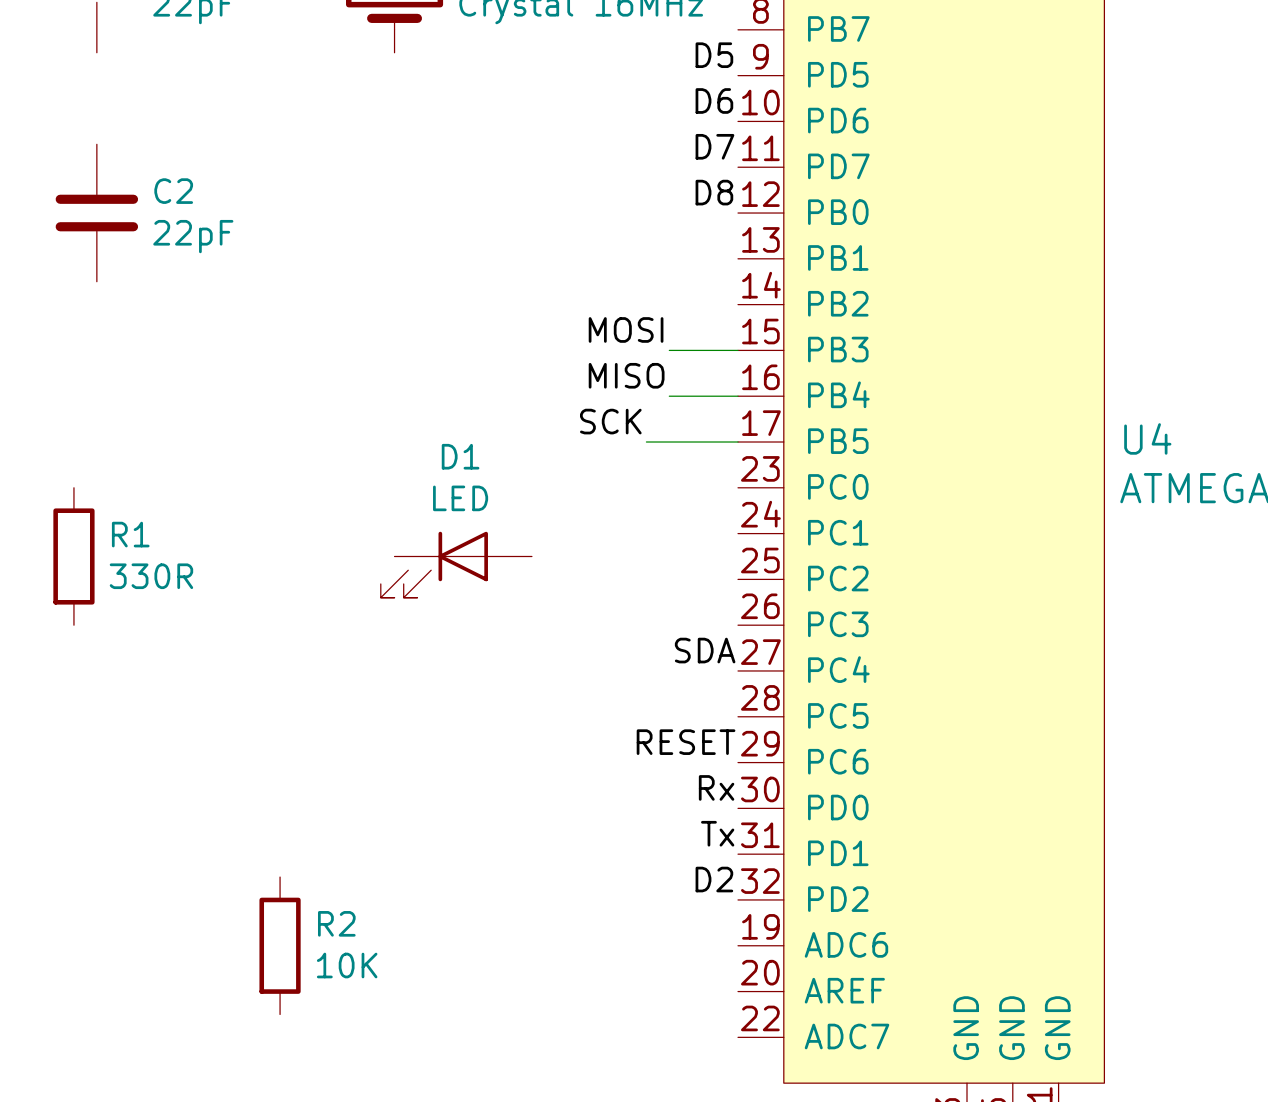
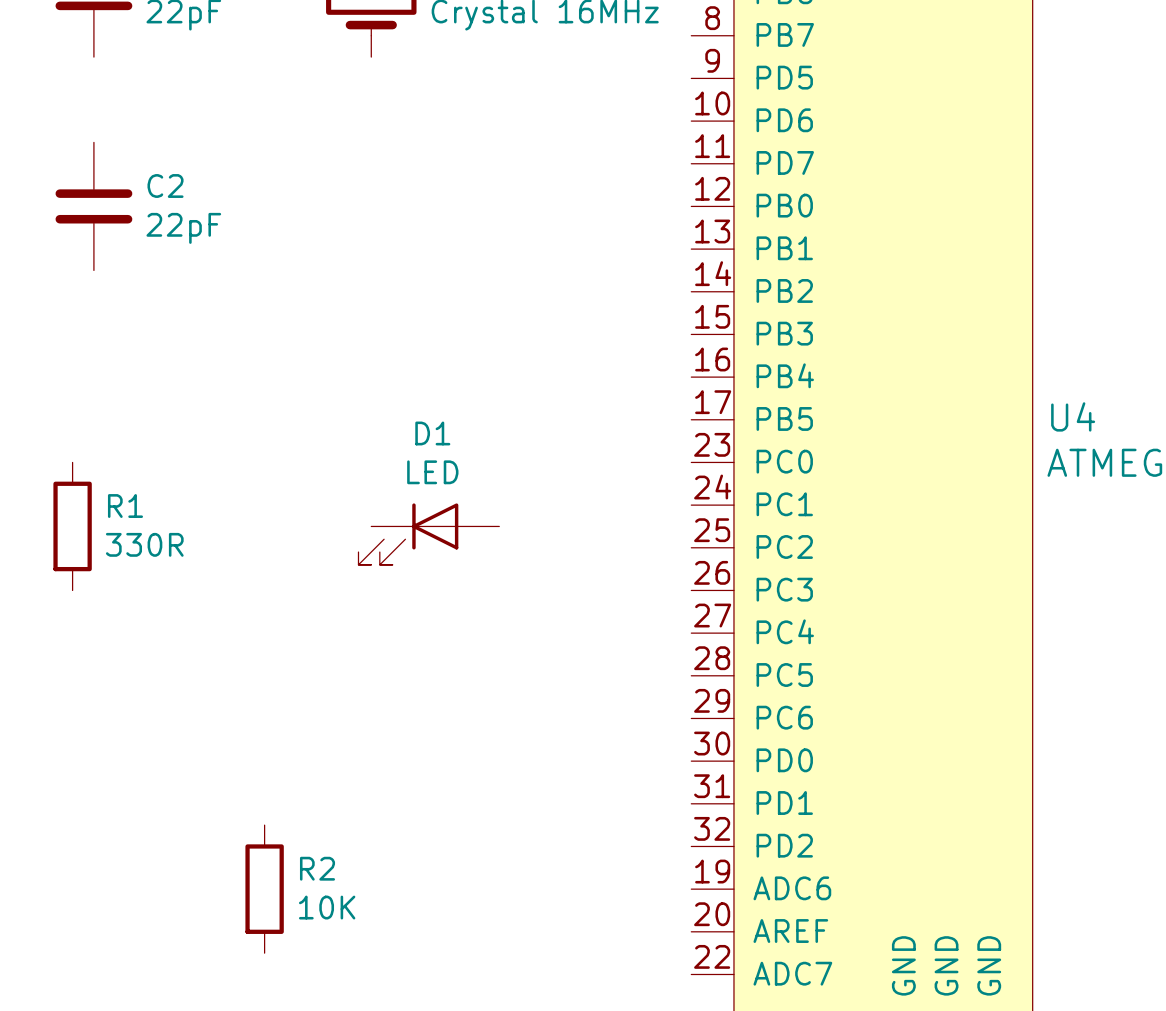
label: D5 (714, 55) -> none
label: D6 (714, 100) -> none
label: D7 (714, 146) -> none
label: D8 (714, 192) -> none
label: MOSI (626, 329) -> none
wire: (669, 350) (738, 350) -> none
label: MISO (626, 375) -> none
wire: (669, 396) (738, 396) -> none
label: SCK (610, 421) -> none
wire: (646, 442) (738, 442) -> none
label: SDA (705, 650) -> none
label: RESET (686, 742) -> none
label: Rx (716, 787) -> none
label: Tx (717, 833) -> none
label: D2 (714, 879) -> none

